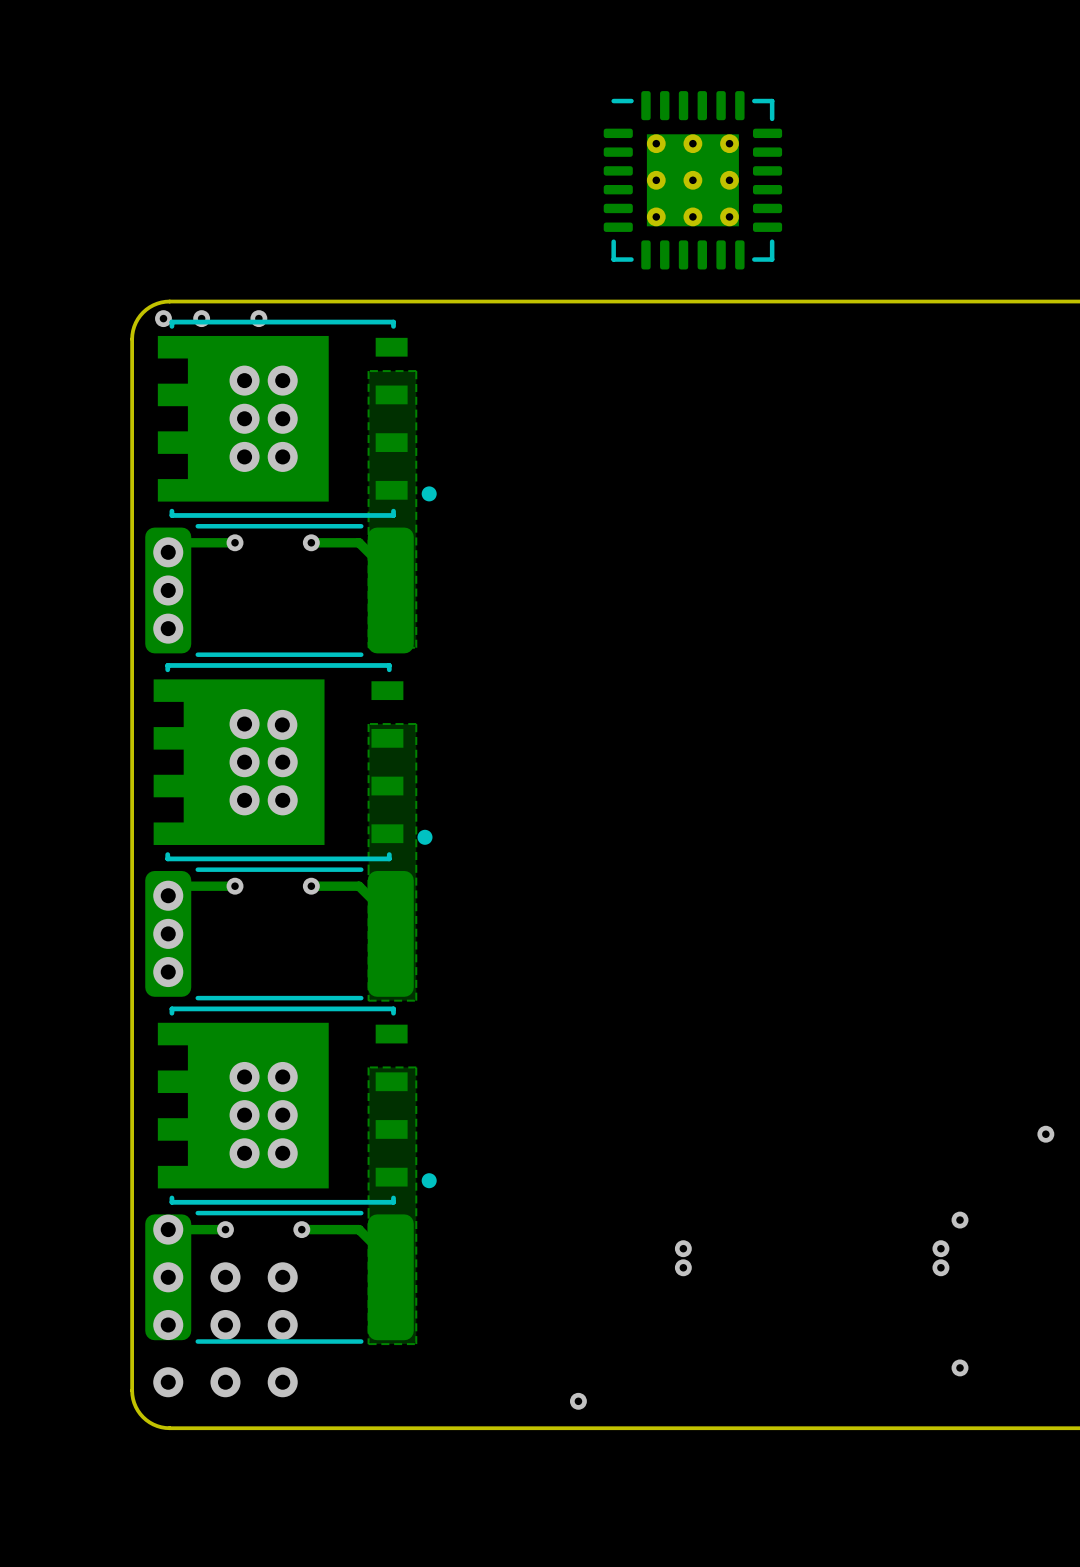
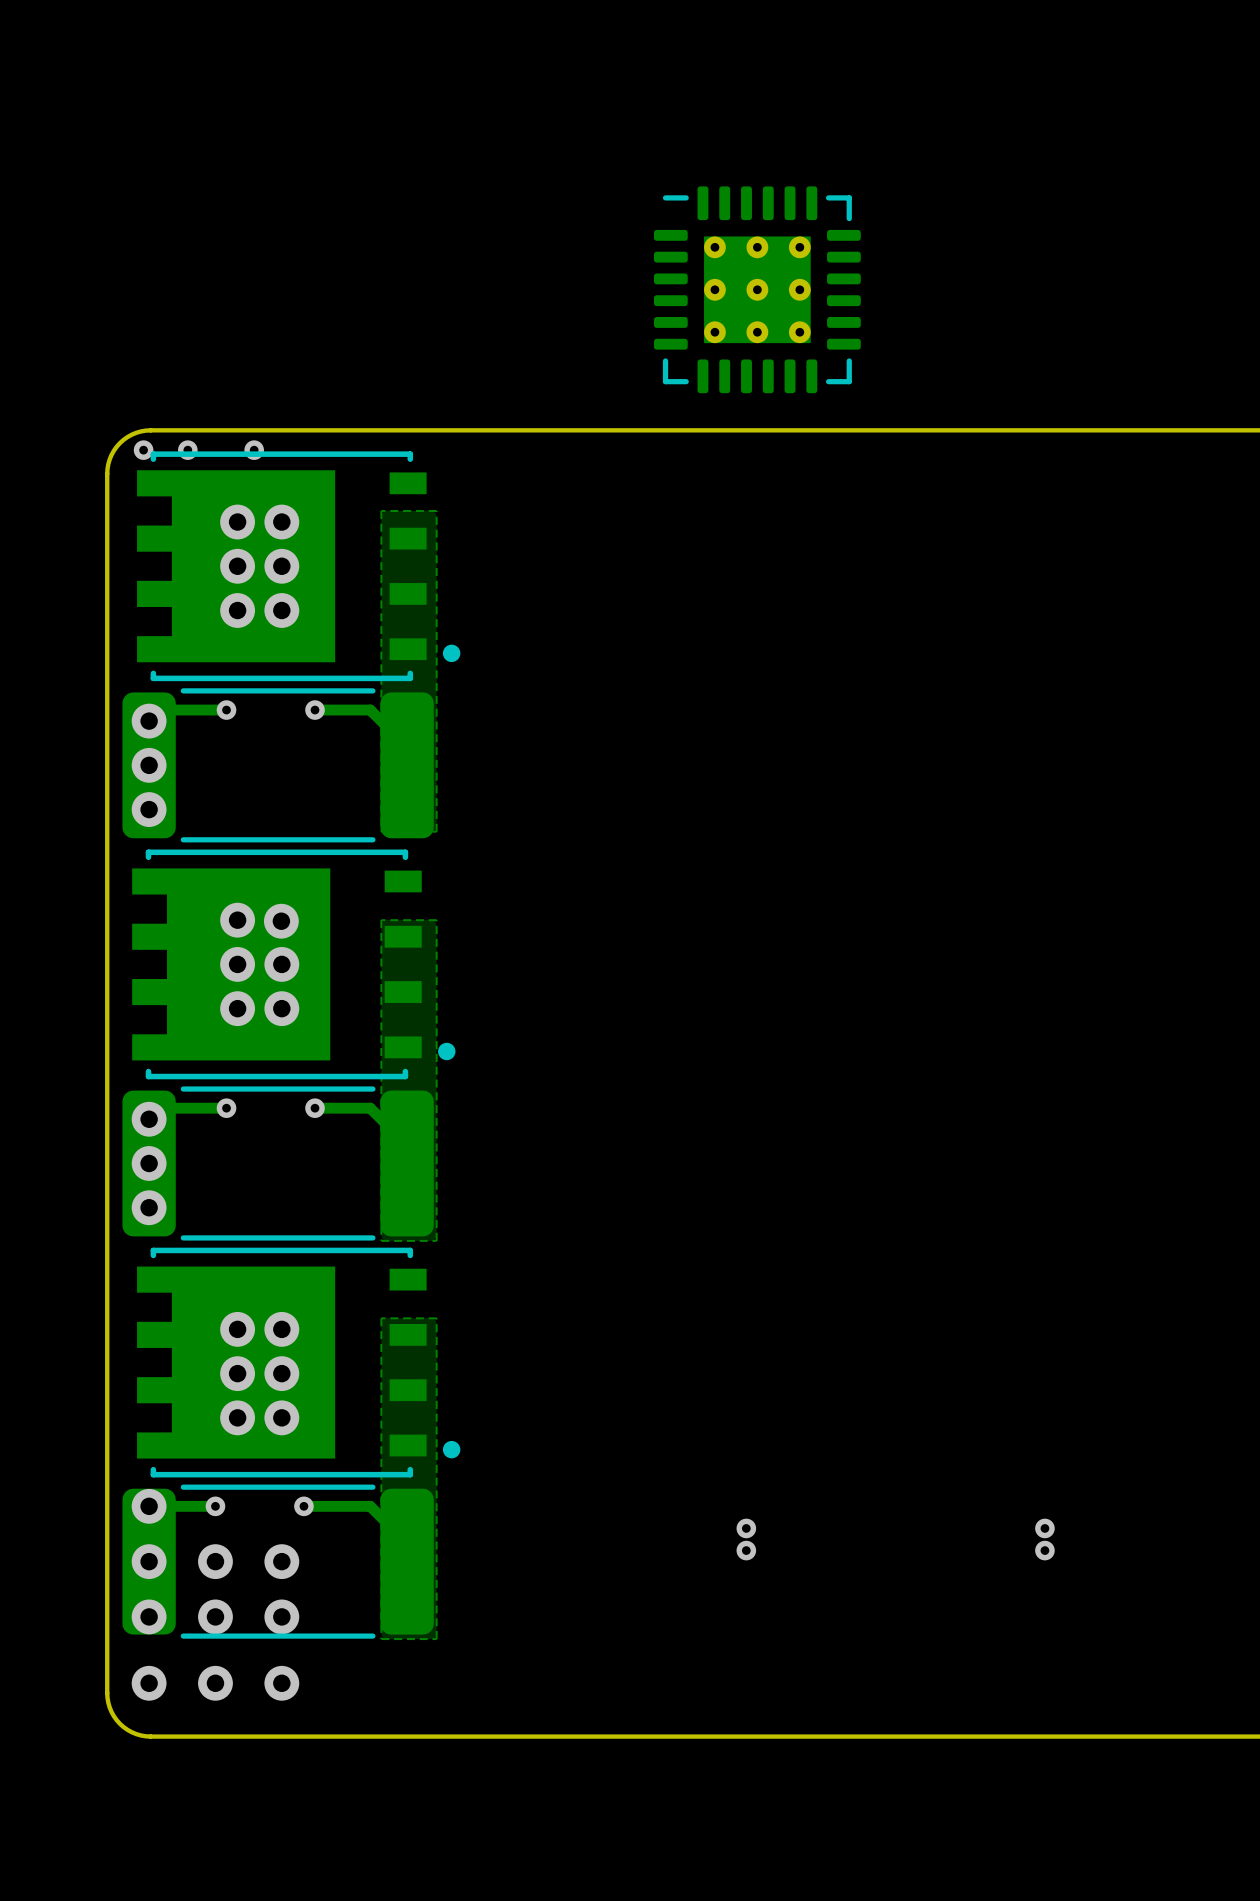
via: (1045, 1134) -> none
via: (960, 1220) -> none
via: (960, 1367) -> none
via: (578, 1401) -> none

